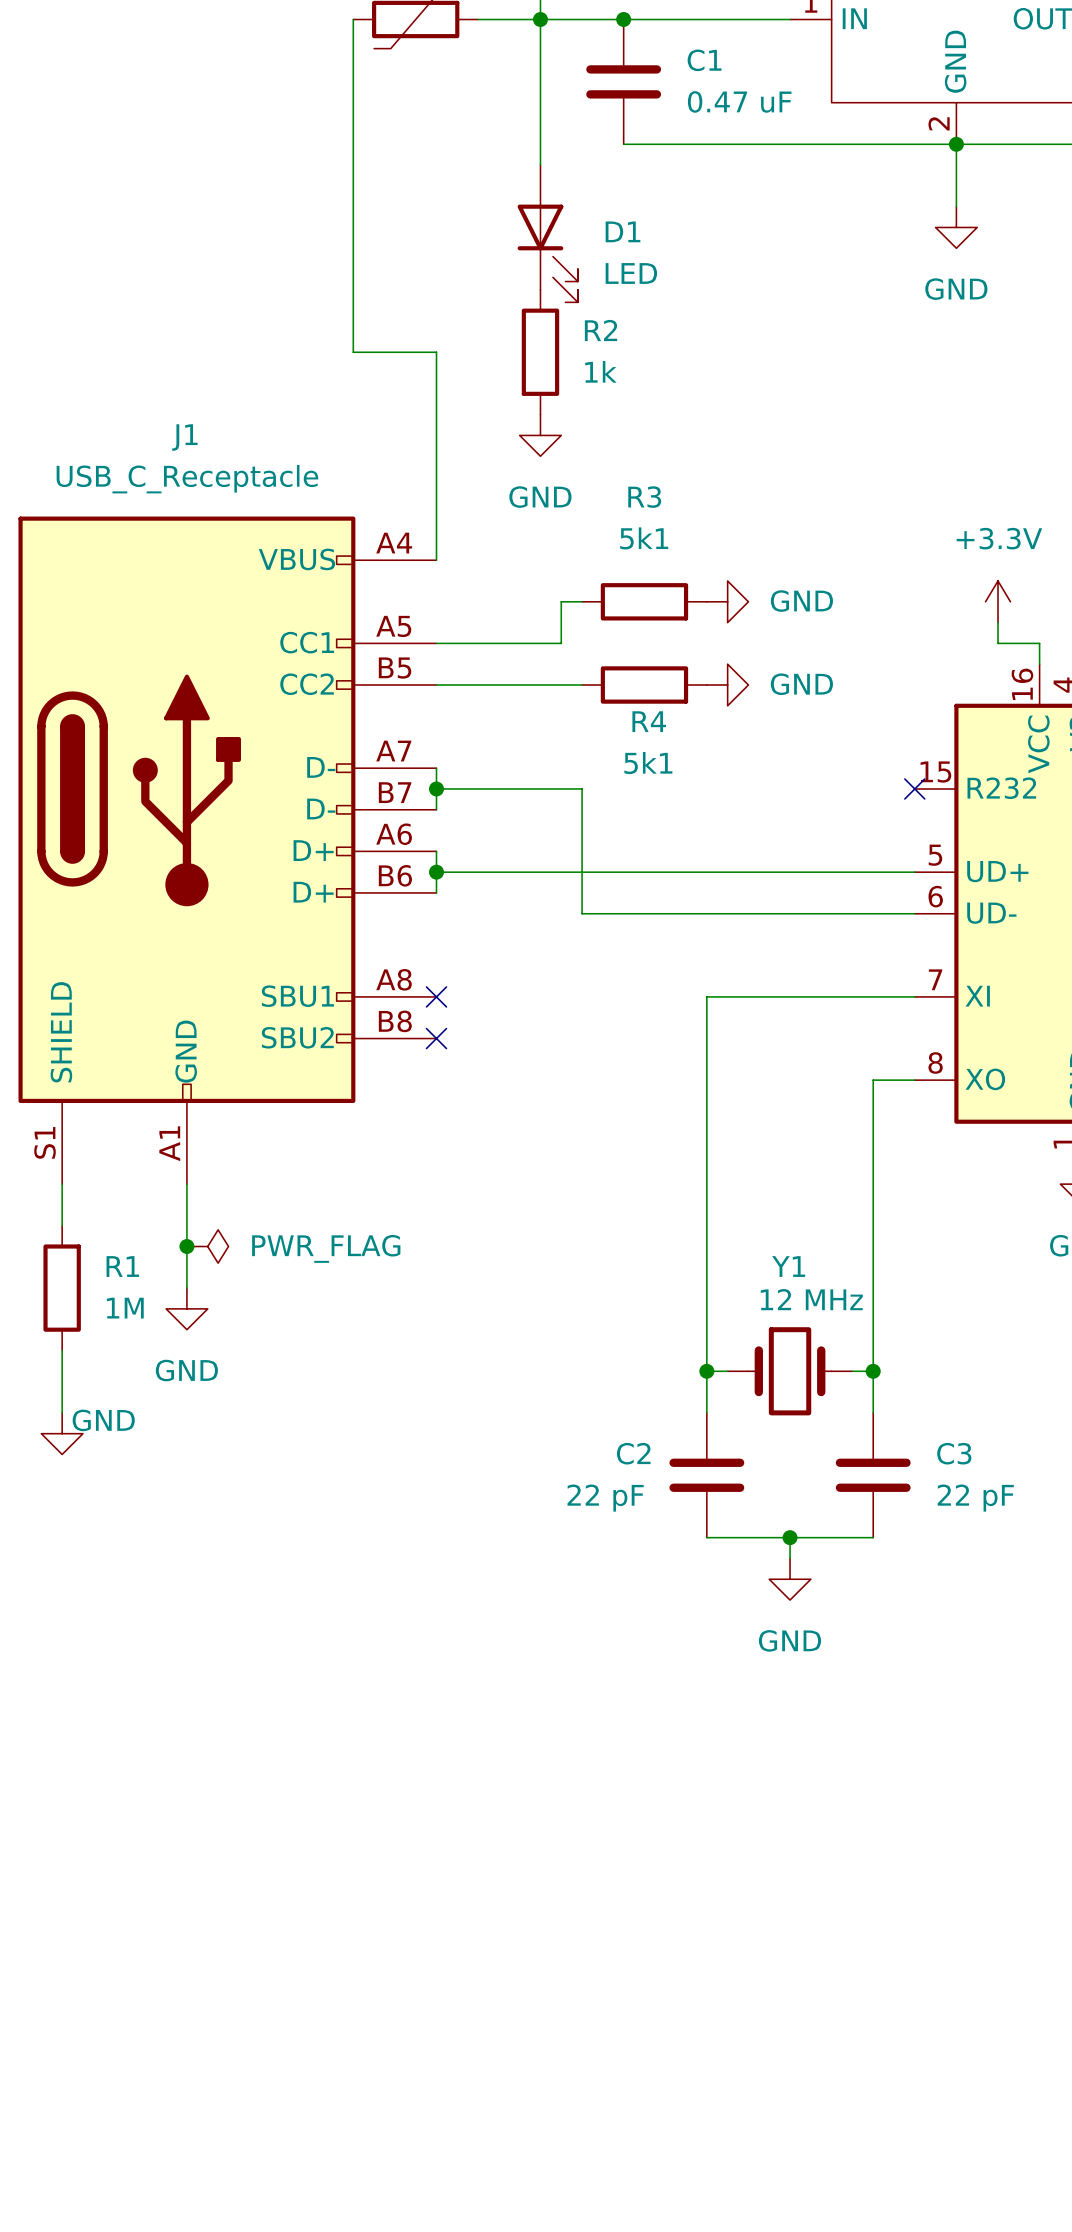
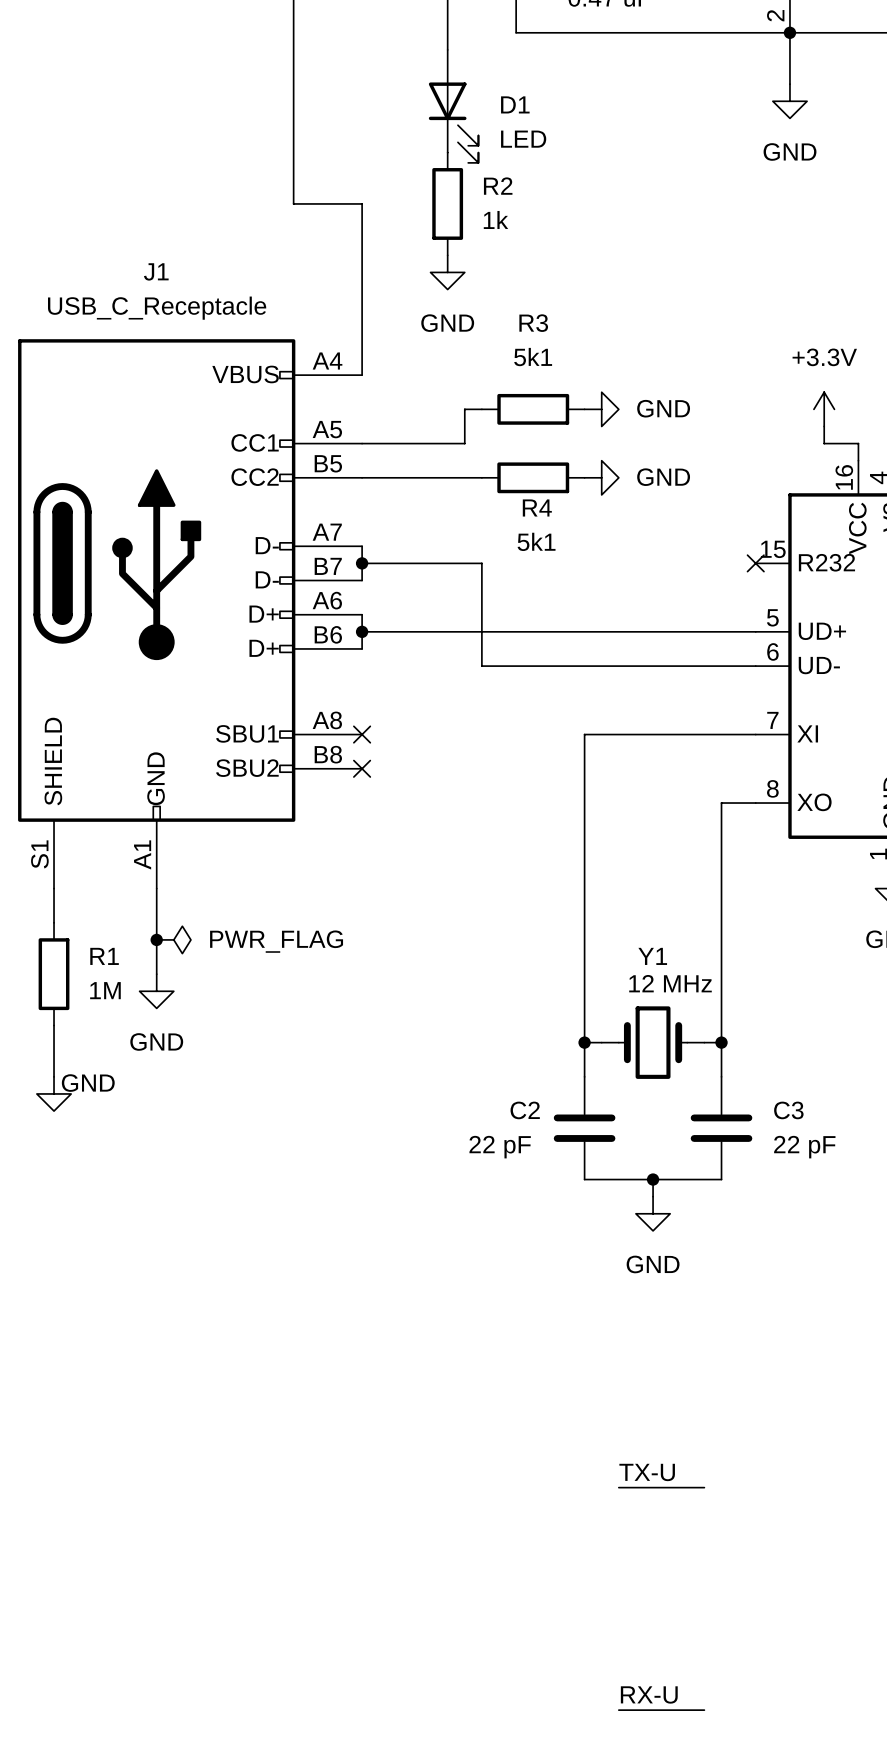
label: none -> TX-U (647, 1472)
wire: none -> (618, 1487) (704, 1487)
label: none -> RX-U (649, 1694)
wire: none -> (618, 1710) (704, 1710)

